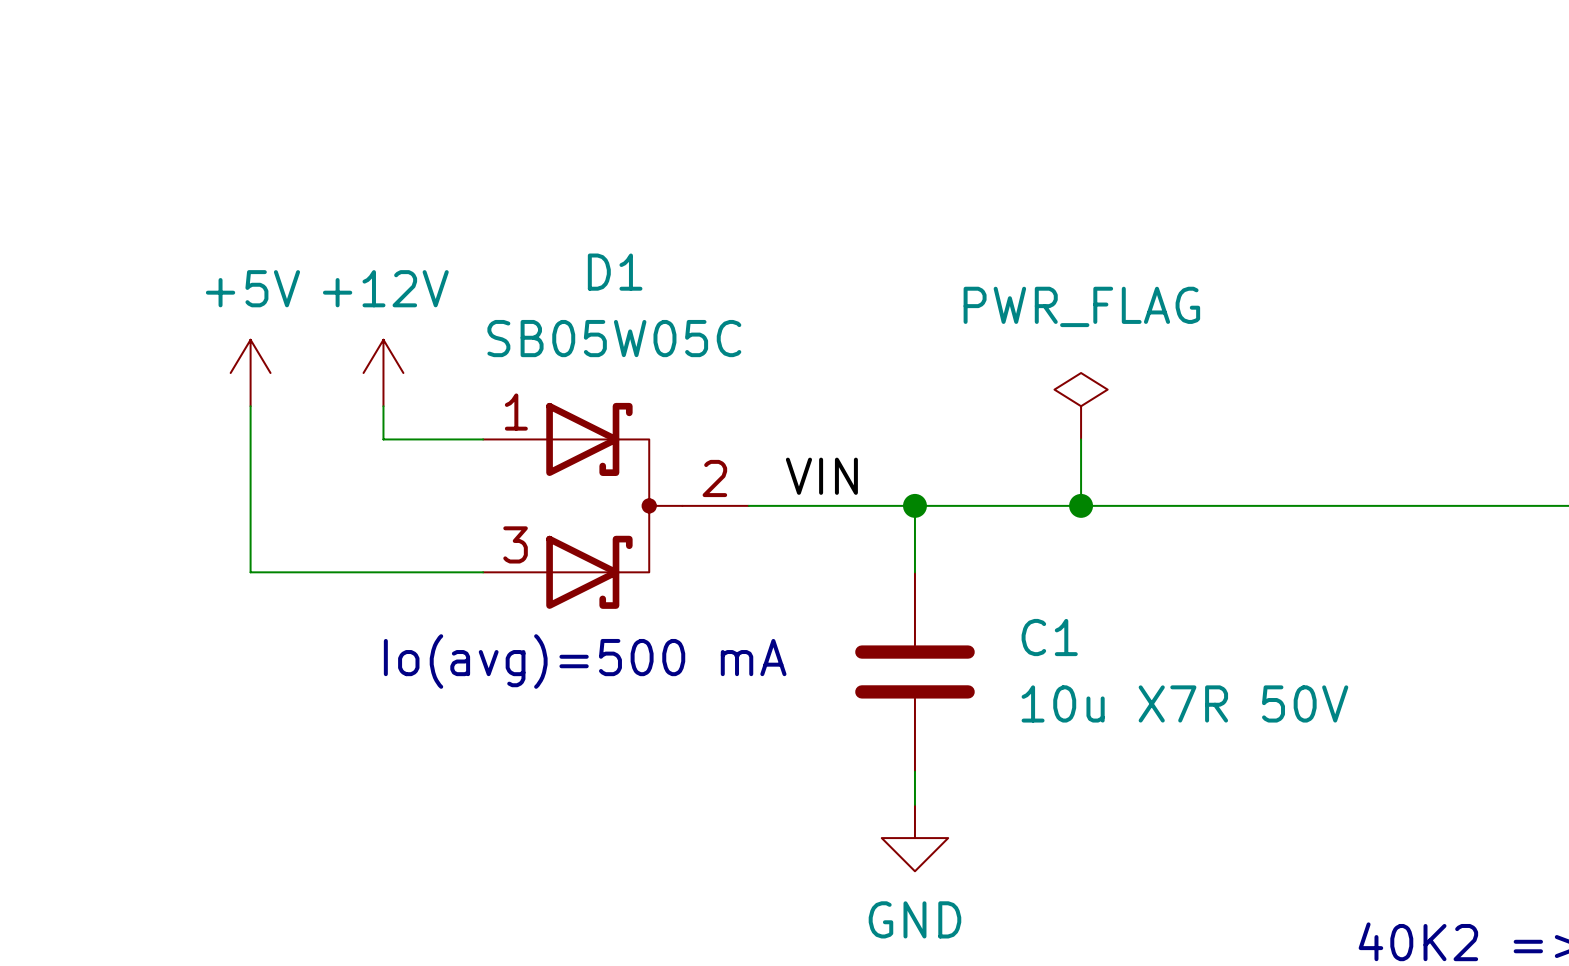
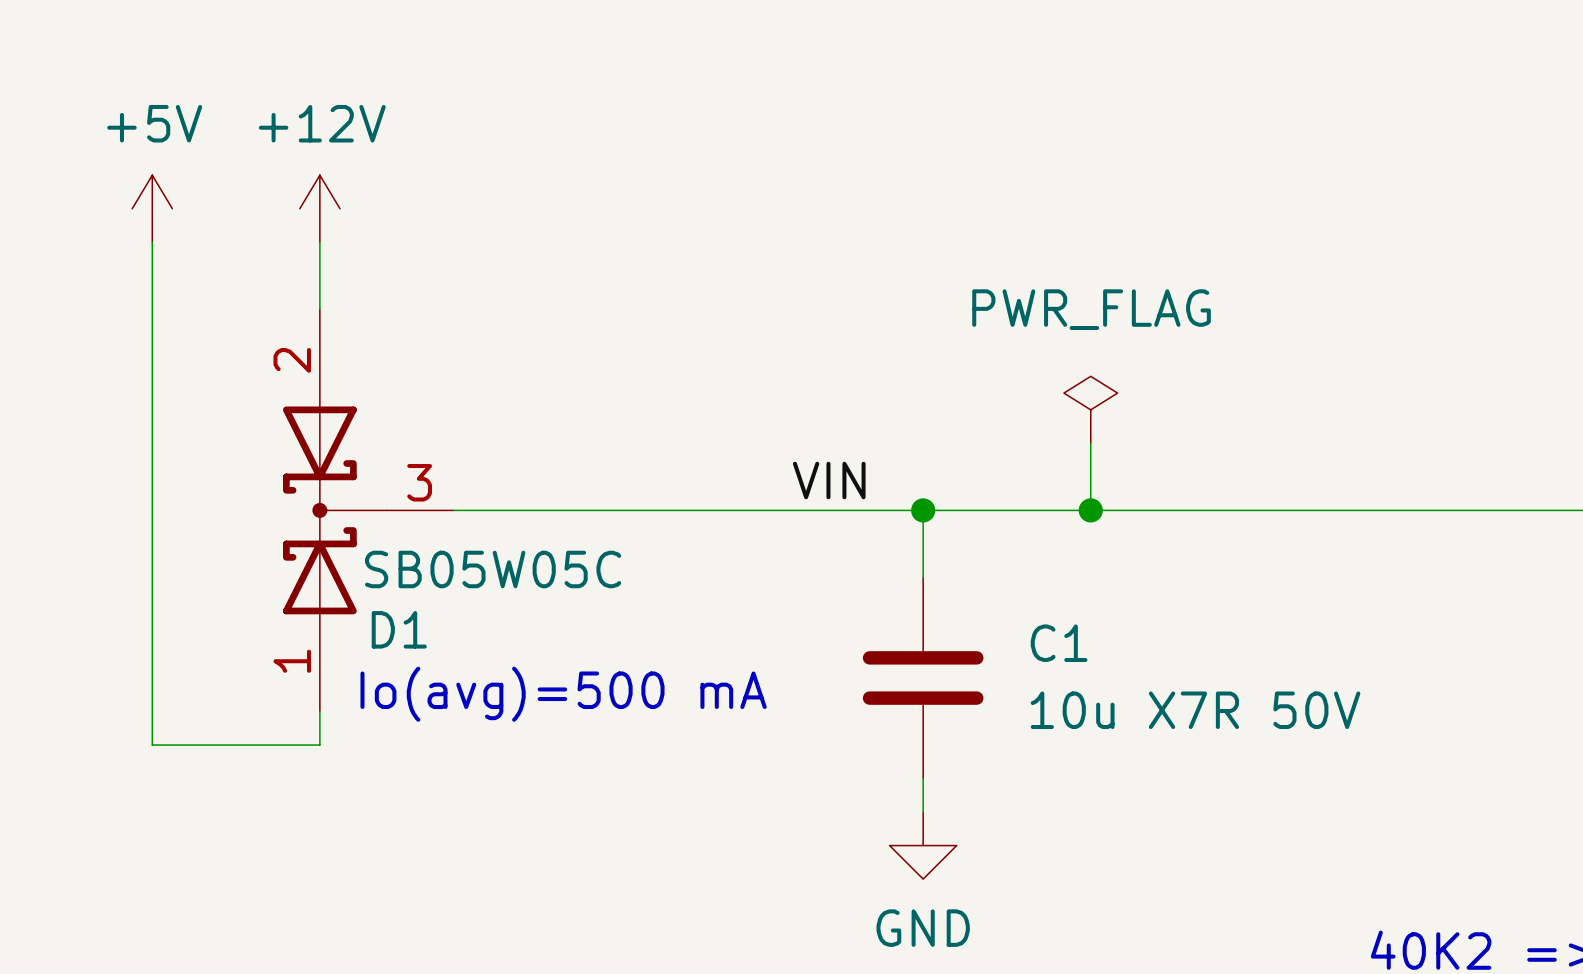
wire: none -> (152, 242) (152, 745) (319, 745) (319, 711)
wire: none -> (319, 242) (319, 309)
D1 name position: D1 (615, 272) -> D1 (399, 629)
D1 value position: SB05W05C (614, 338) -> SB05W05C (493, 569)
power symbol position: +5V (250, 373) -> +5V (152, 208)
power symbol position: +12V (383, 373) -> +12V (319, 208)
D1 symbol: [483, 402, 749, 609] -> [283, 309, 454, 712]
wire: (250, 406) (250, 572) (483, 572) -> none
wire: (383, 406) (383, 439) (483, 439) -> none
wire: none -> (453, 510) (755, 510)
text position: Io(avg)=500 mA (585, 661) -> Io(avg)=500 mA (563, 694)

